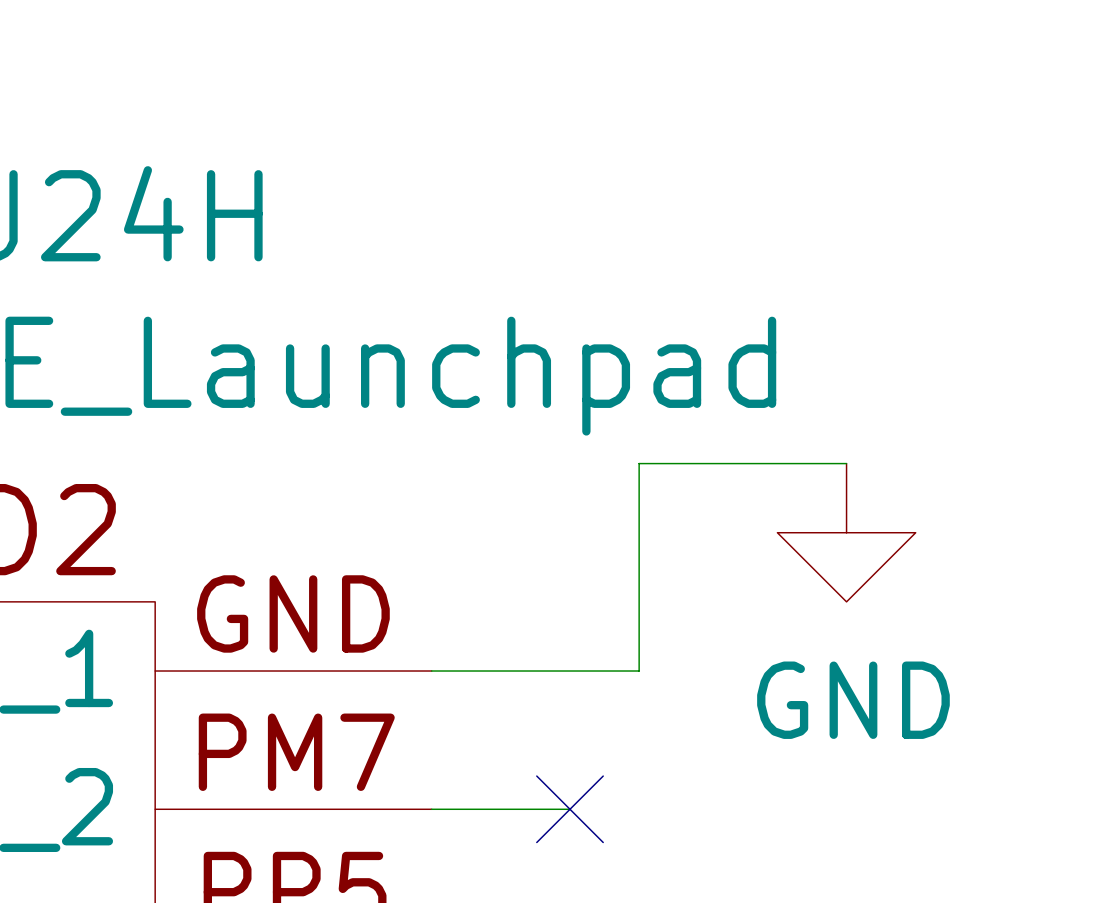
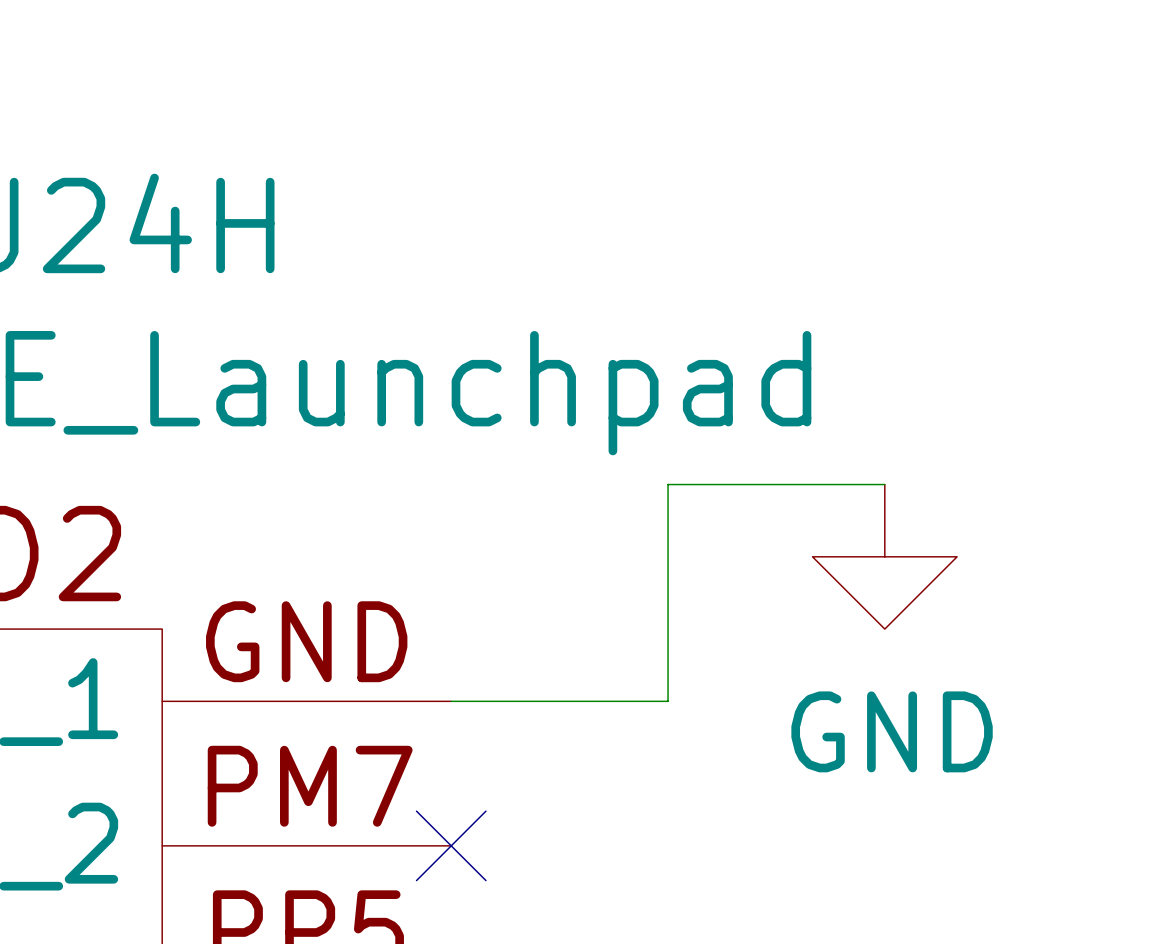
wire: (431, 809) (570, 809) -> none
no-connect mark: none -> (451, 845)
no-connect mark: (570, 809) -> none

